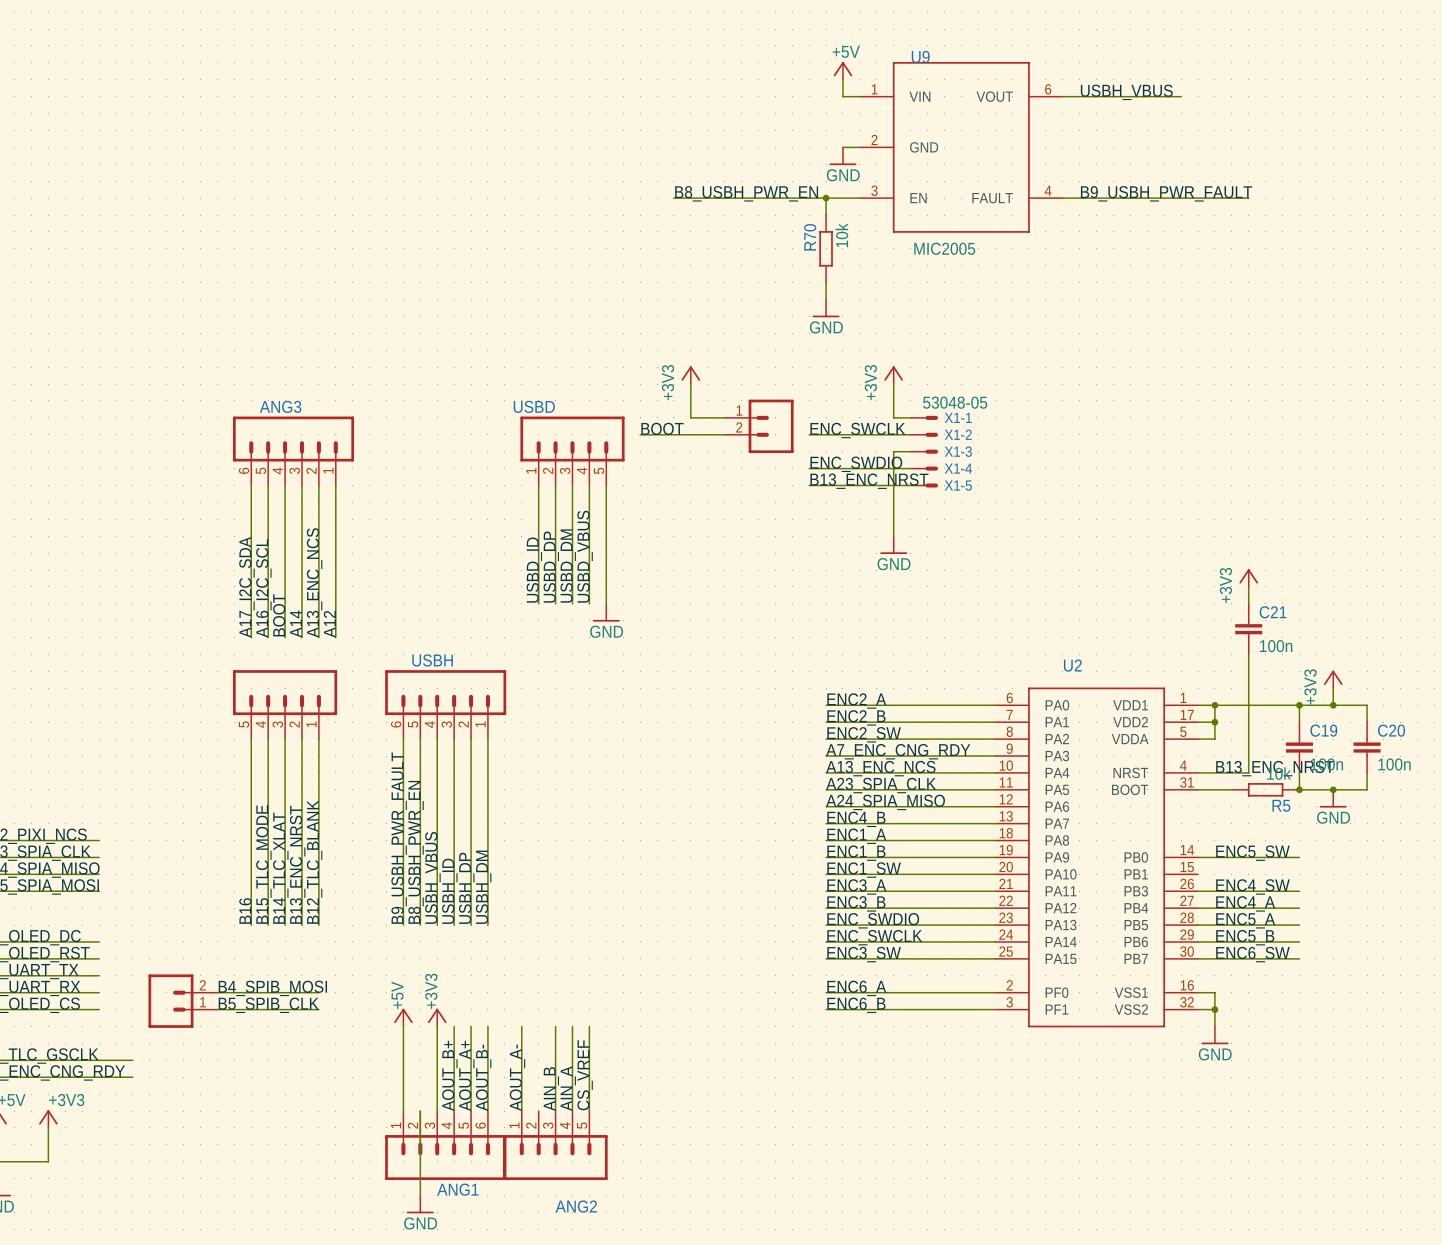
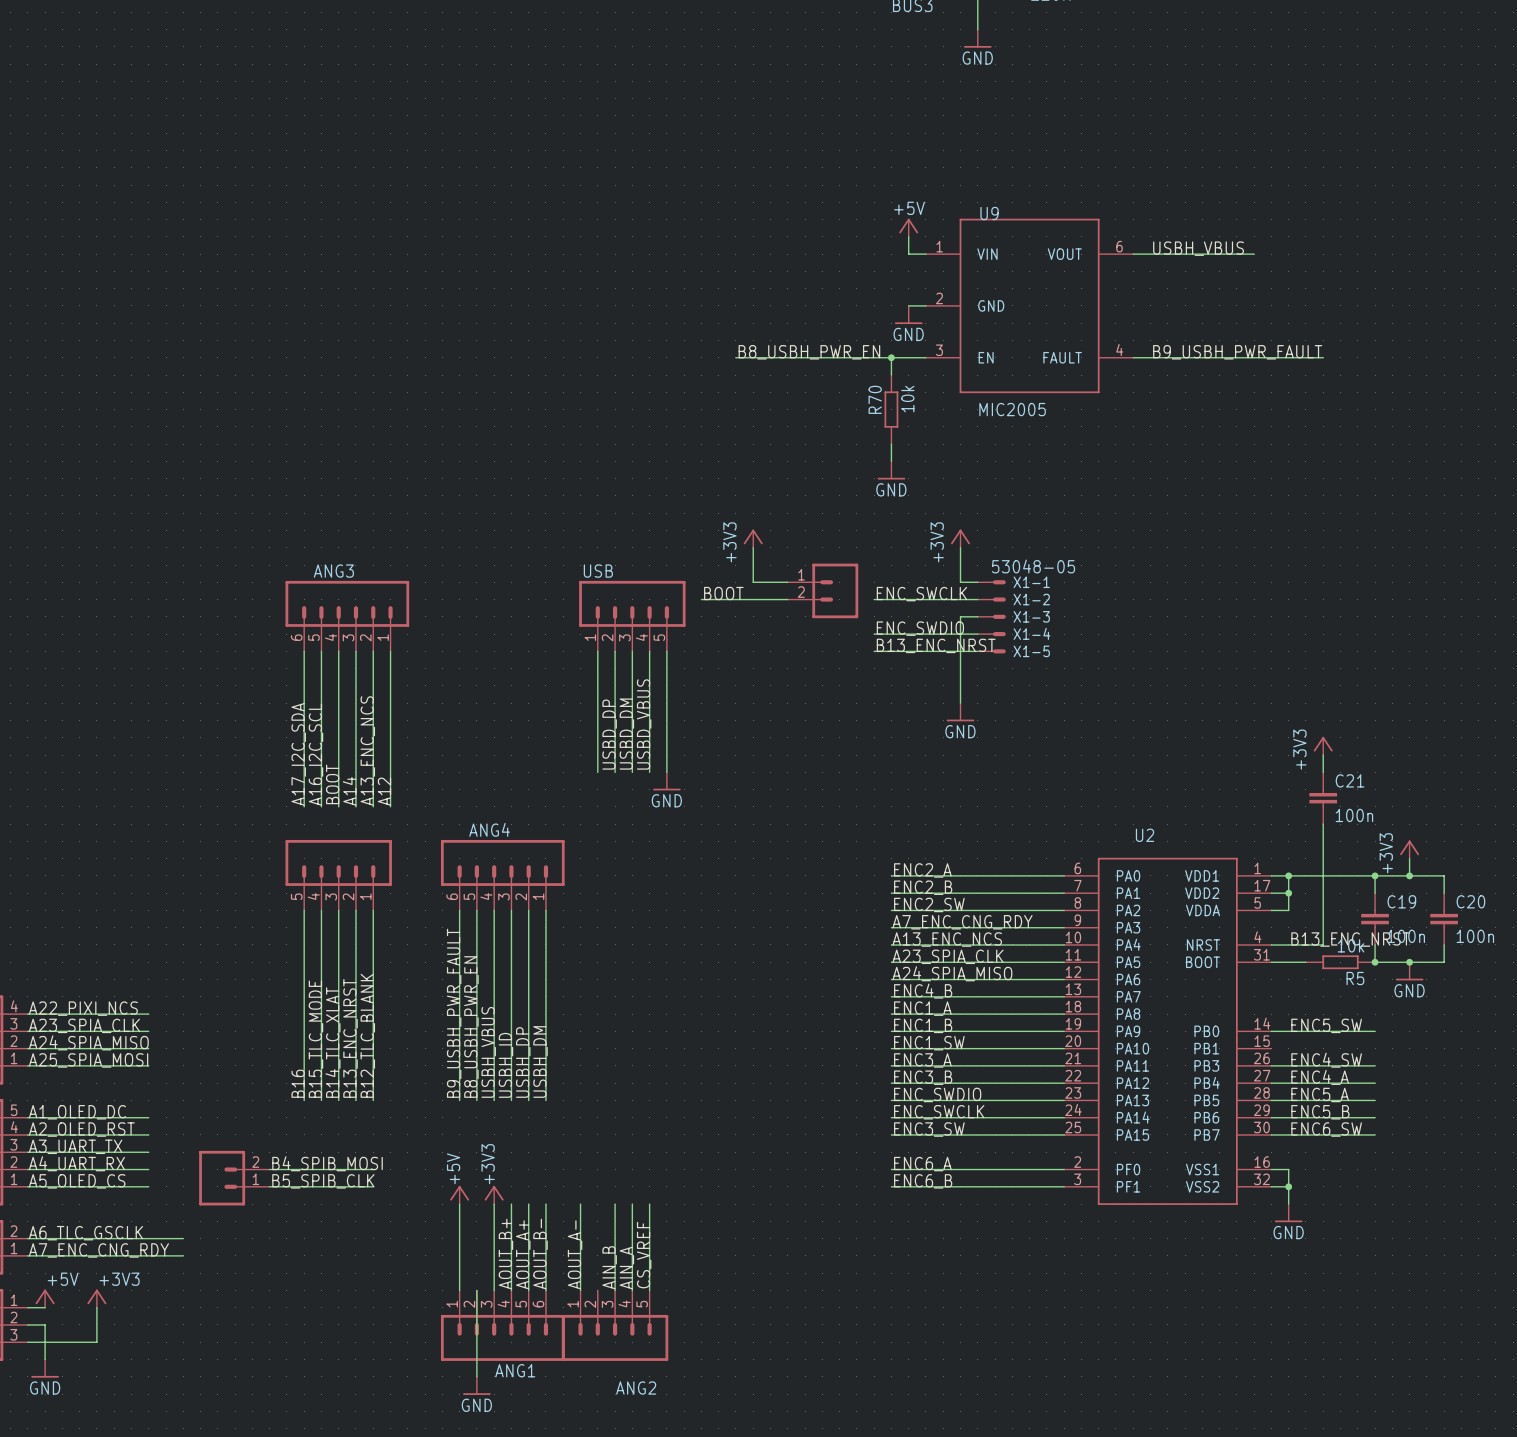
USBD name: USBD (534, 406) -> USB (598, 571)
label: USBD_ID (534, 570) -> none
USBH name: USBH (432, 660) -> ANG4 (489, 829)

